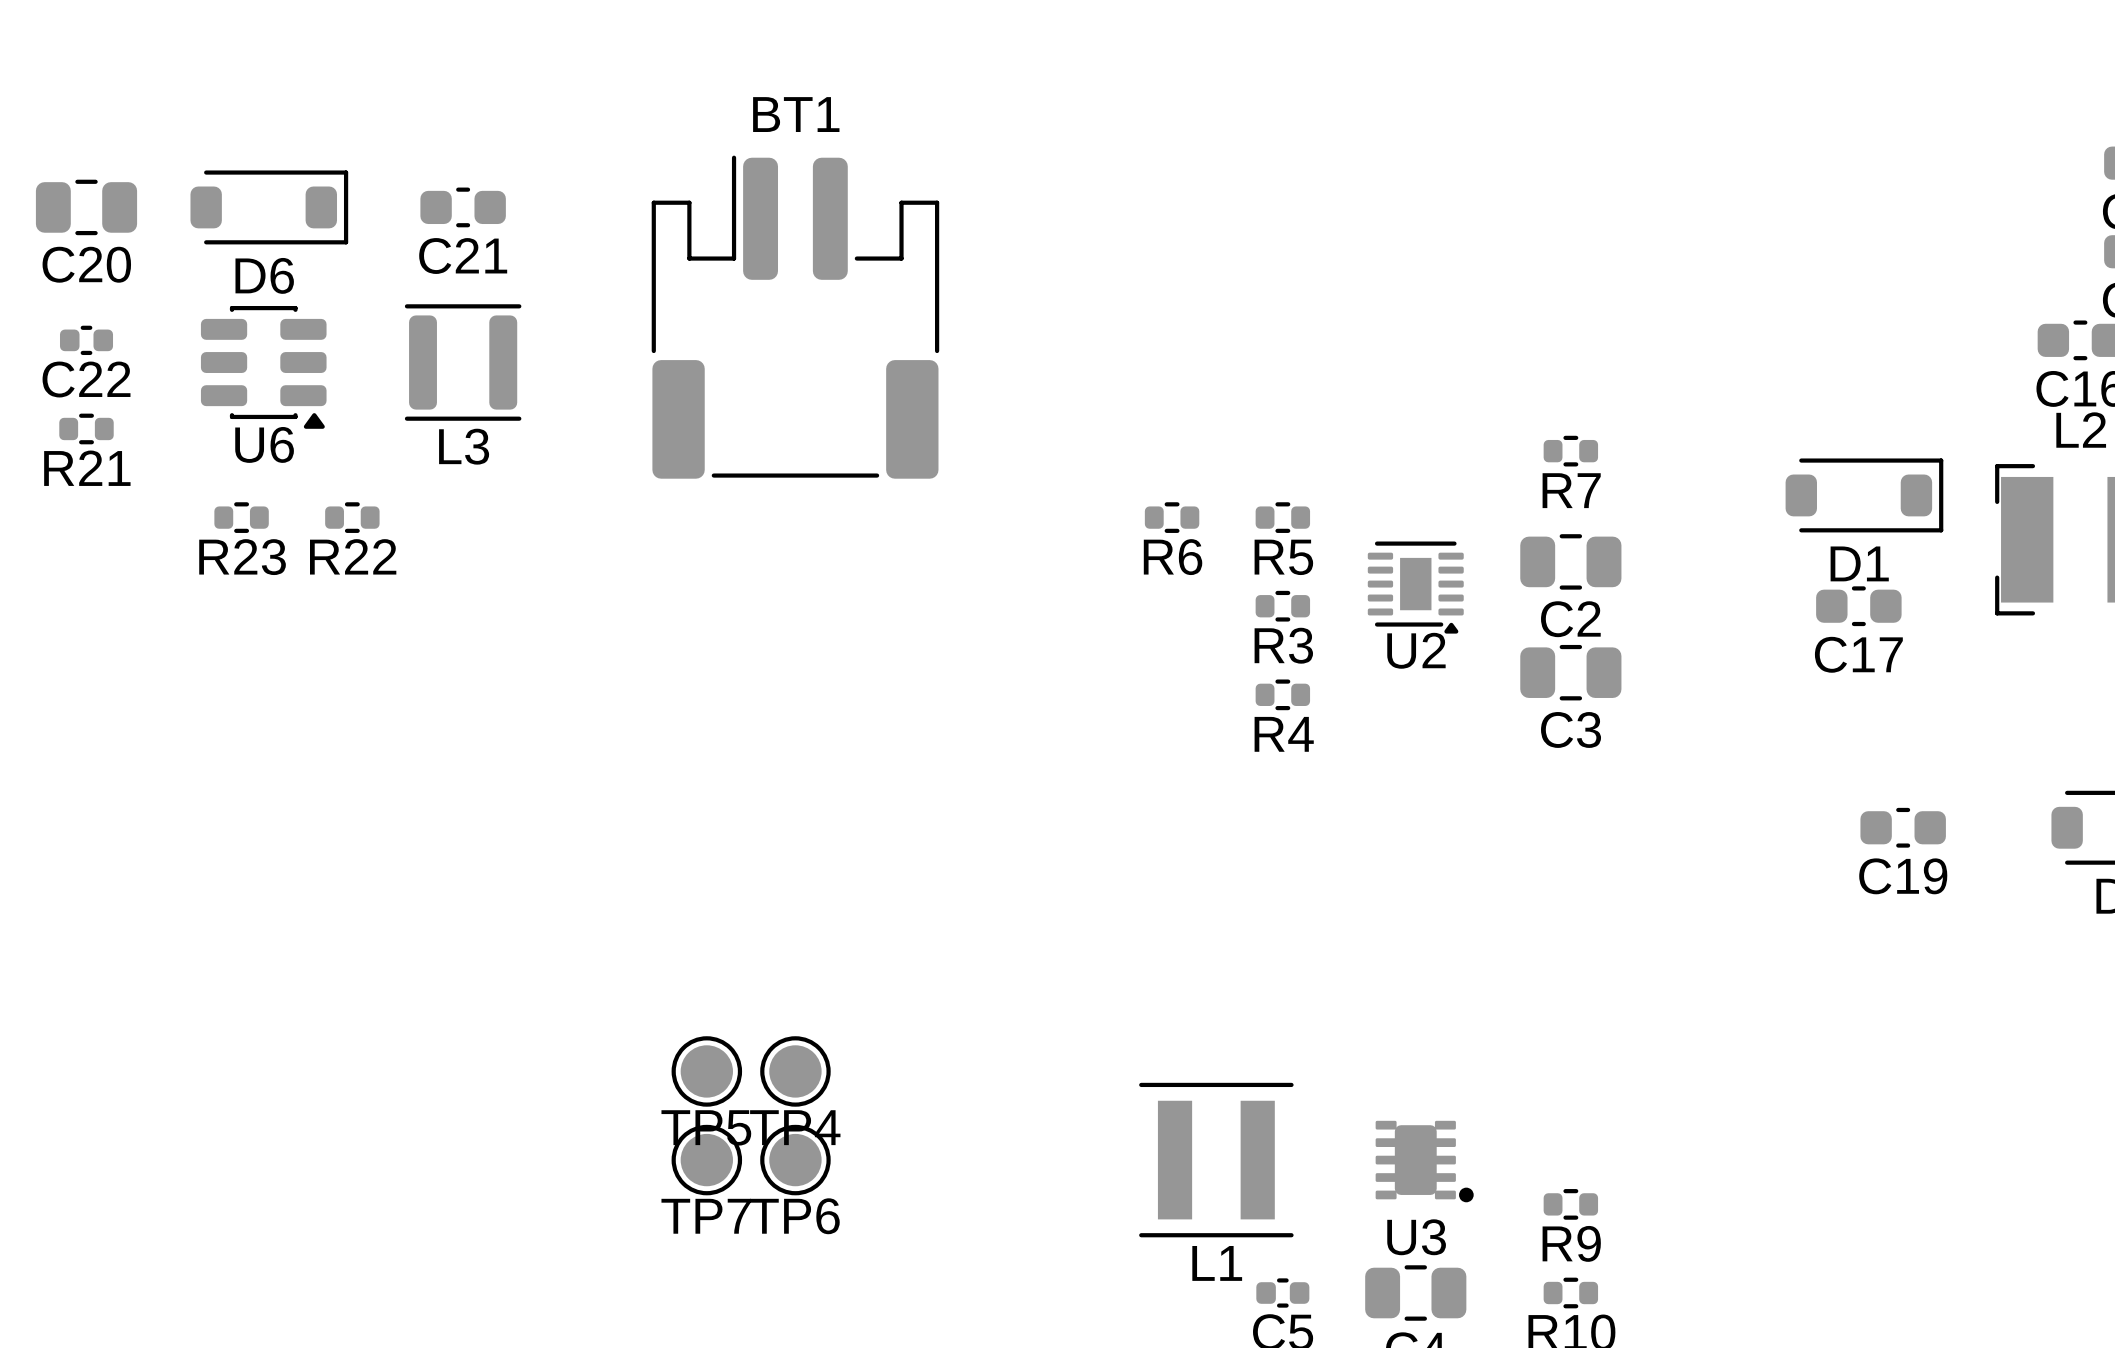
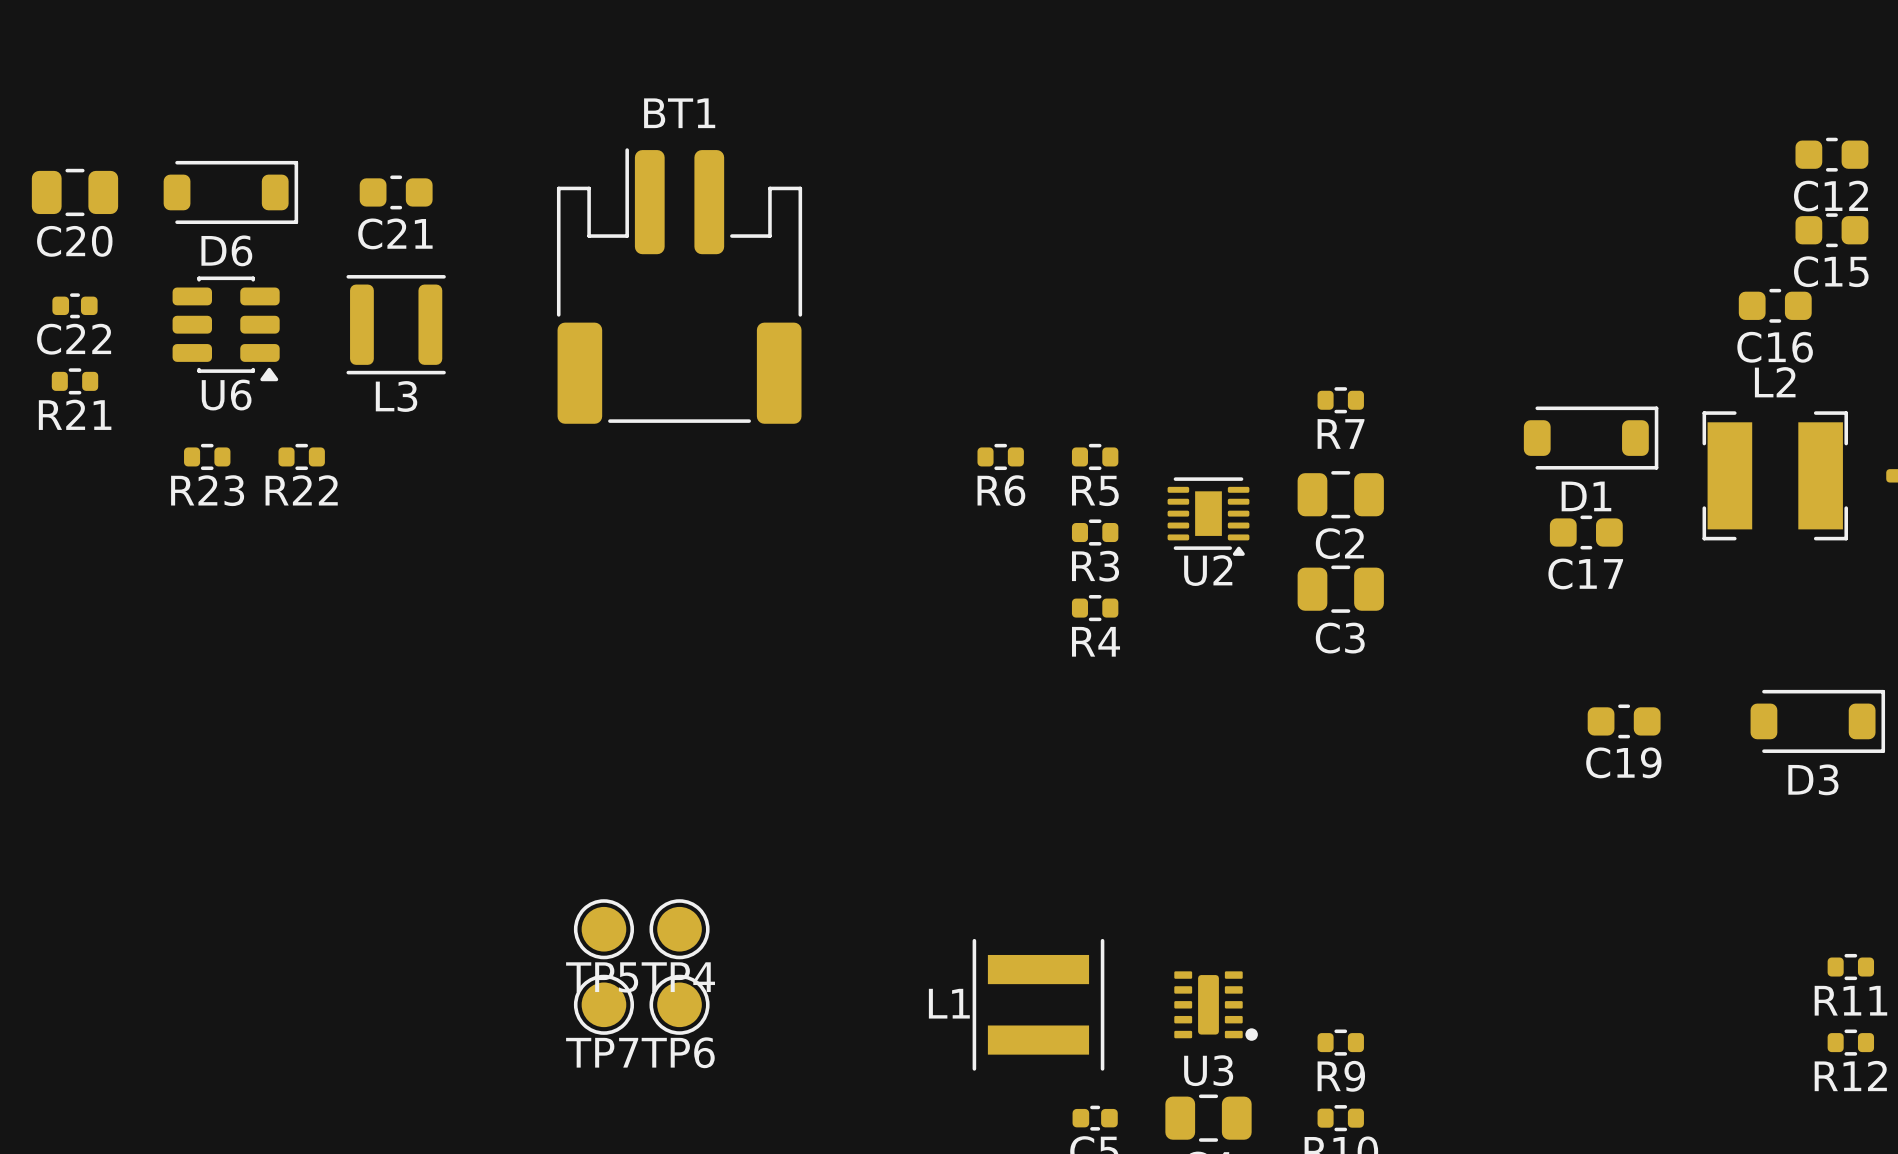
U3 footprint: [1375, 1120, 1474, 1203] -> [1174, 971, 1258, 1041]
L1 rotation: 0° (1216, 1160) -> 90° clockwise (1038, 1004)

